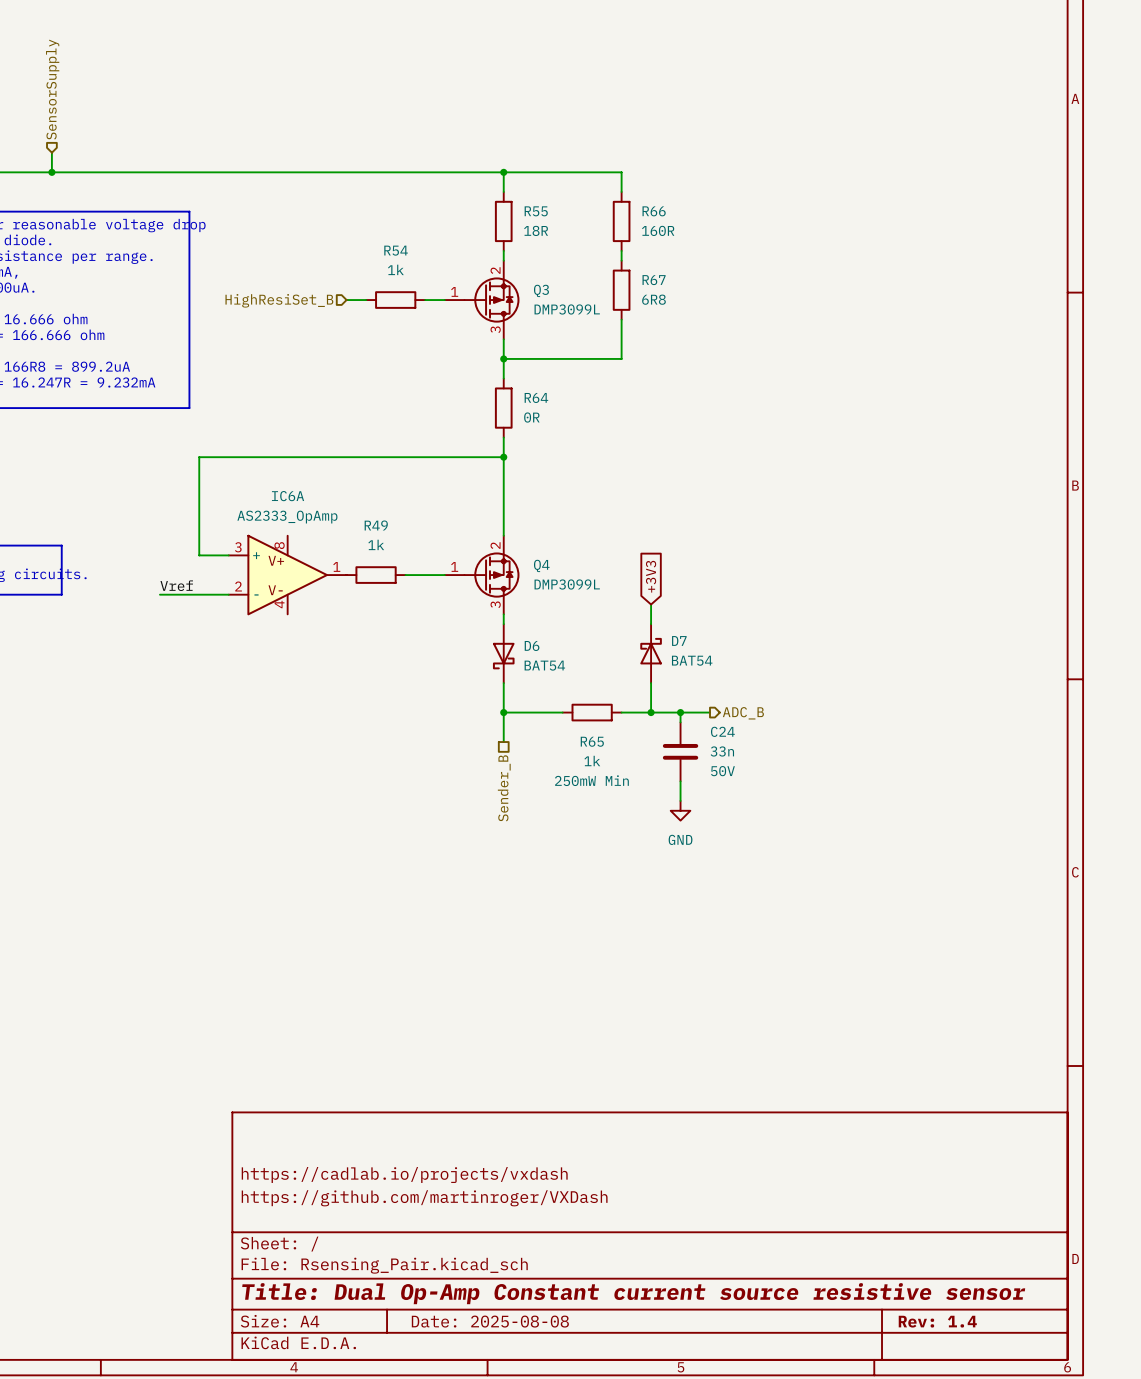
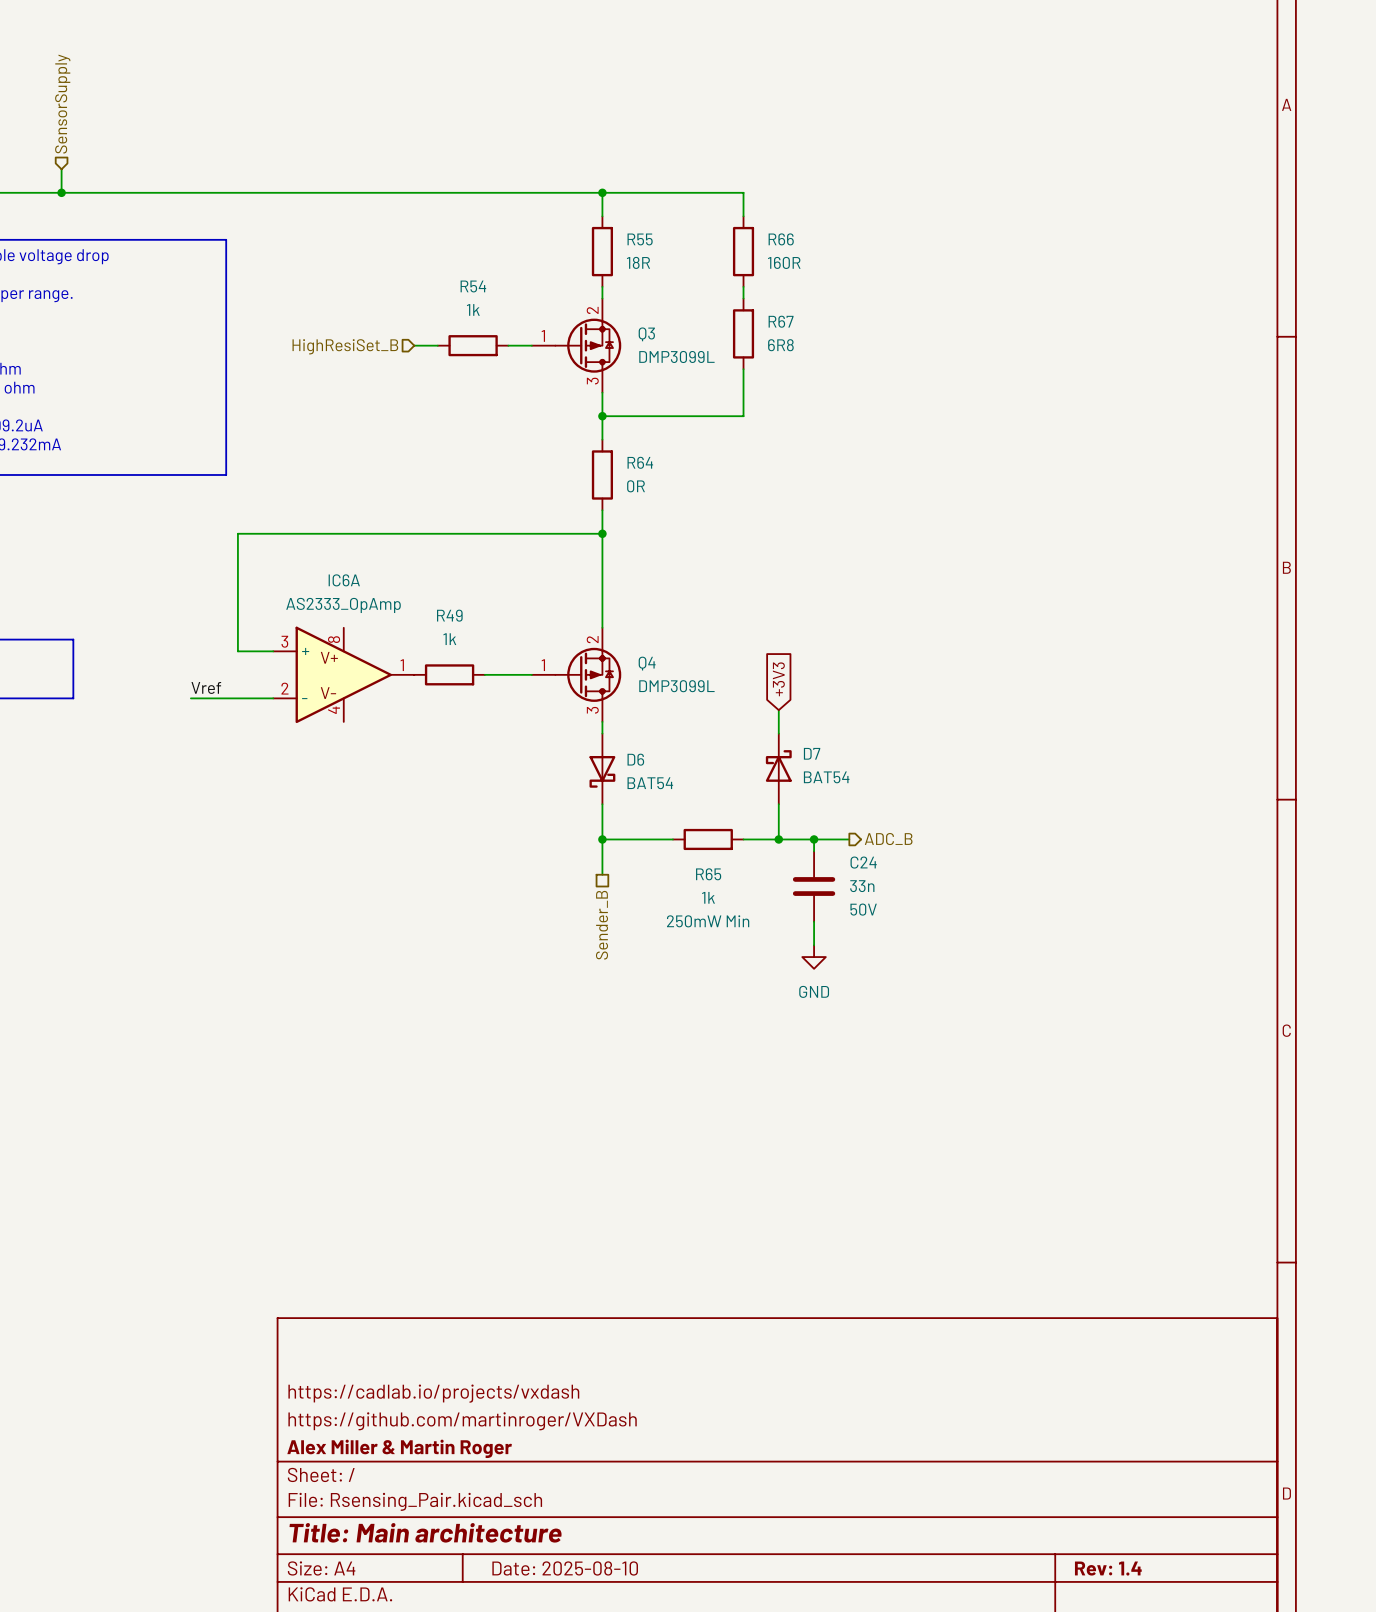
title block: none -> Alex Miller & Martin Roger (399, 1448)
title block: Title: Dual Op-Amp Constant current source resistive sensor (633, 1293) -> Title: Main architecture (425, 1532)
title block: Date: 2025-08-08 (490, 1321) -> Date: 2025-08-10 (565, 1568)

